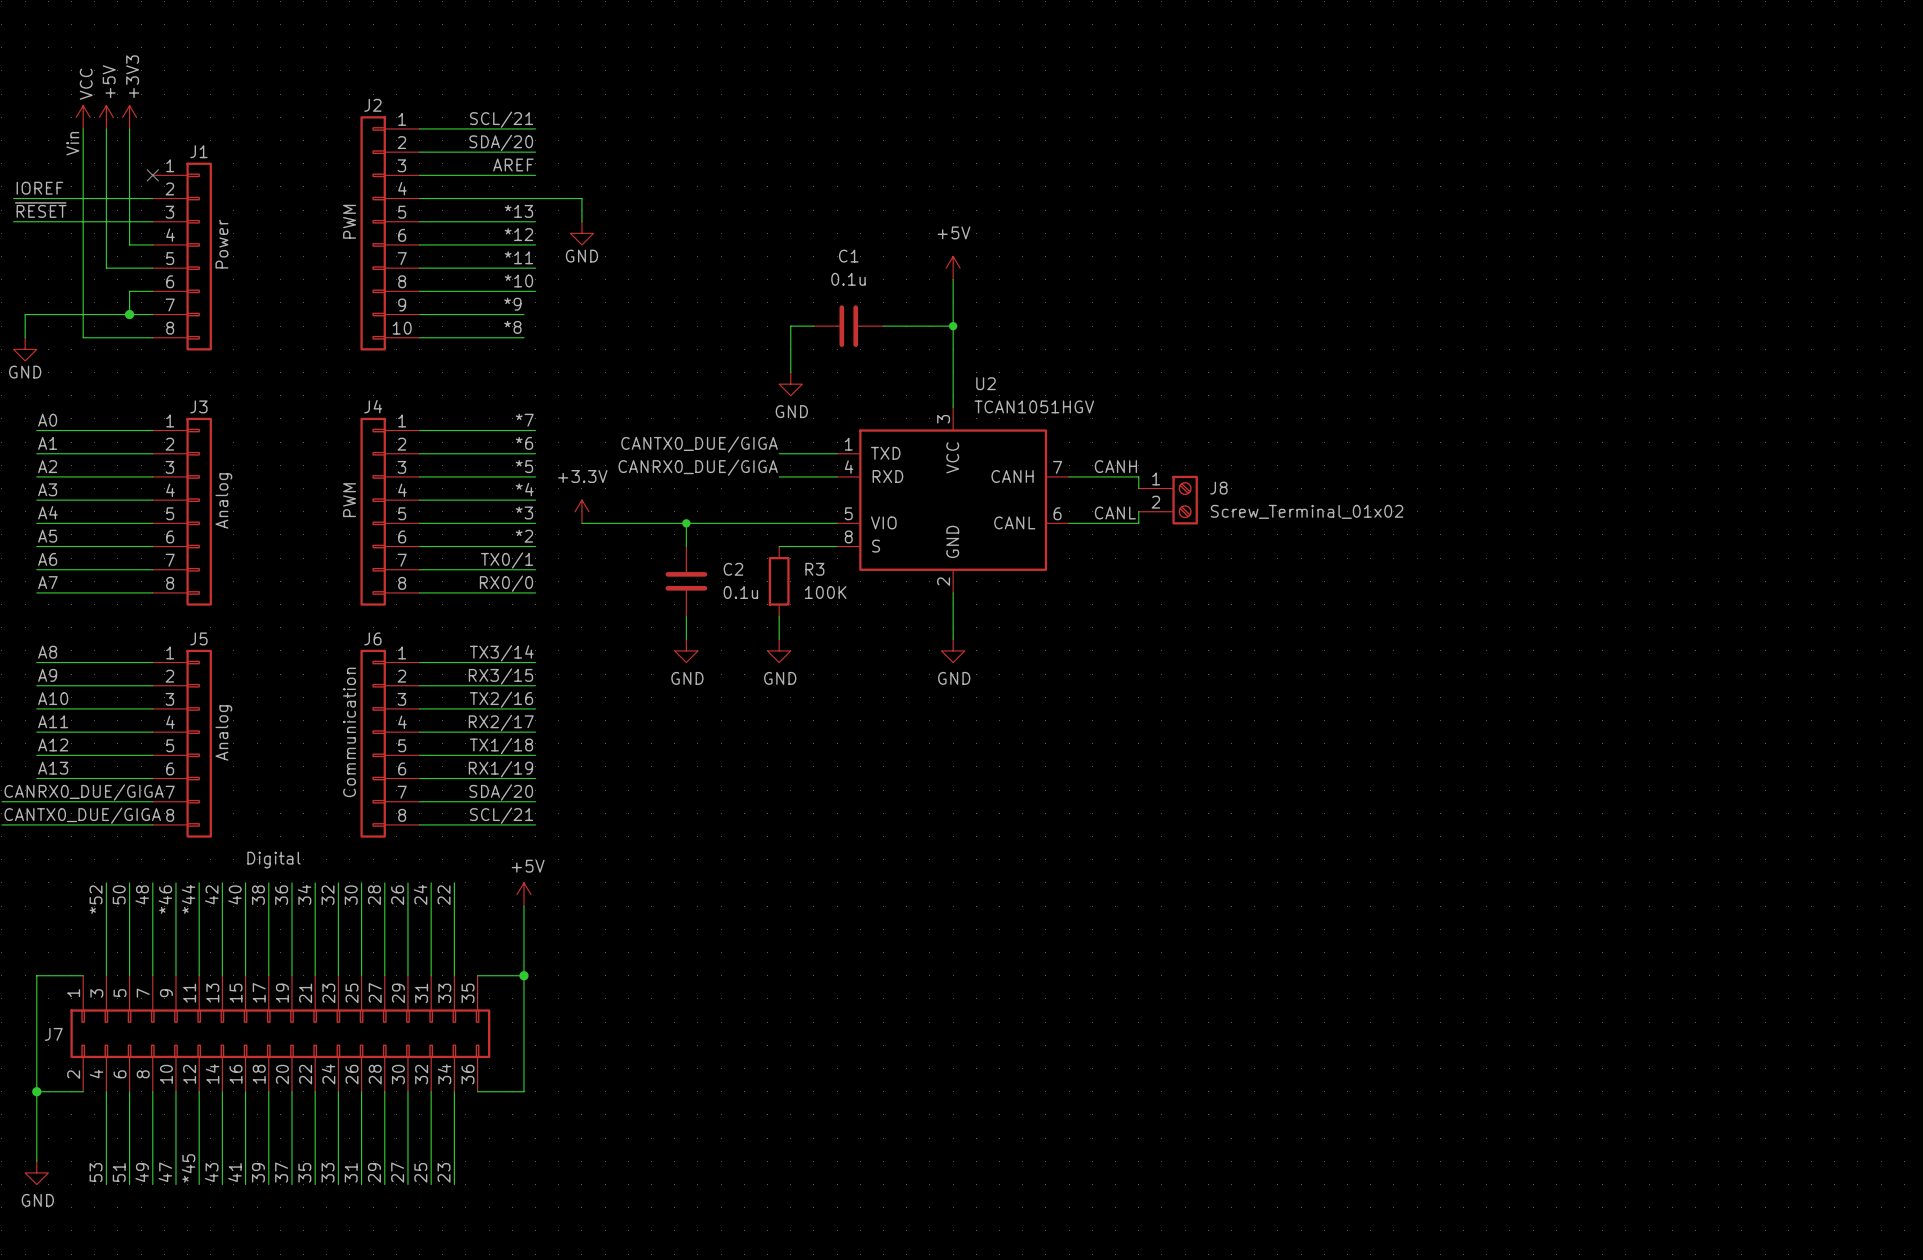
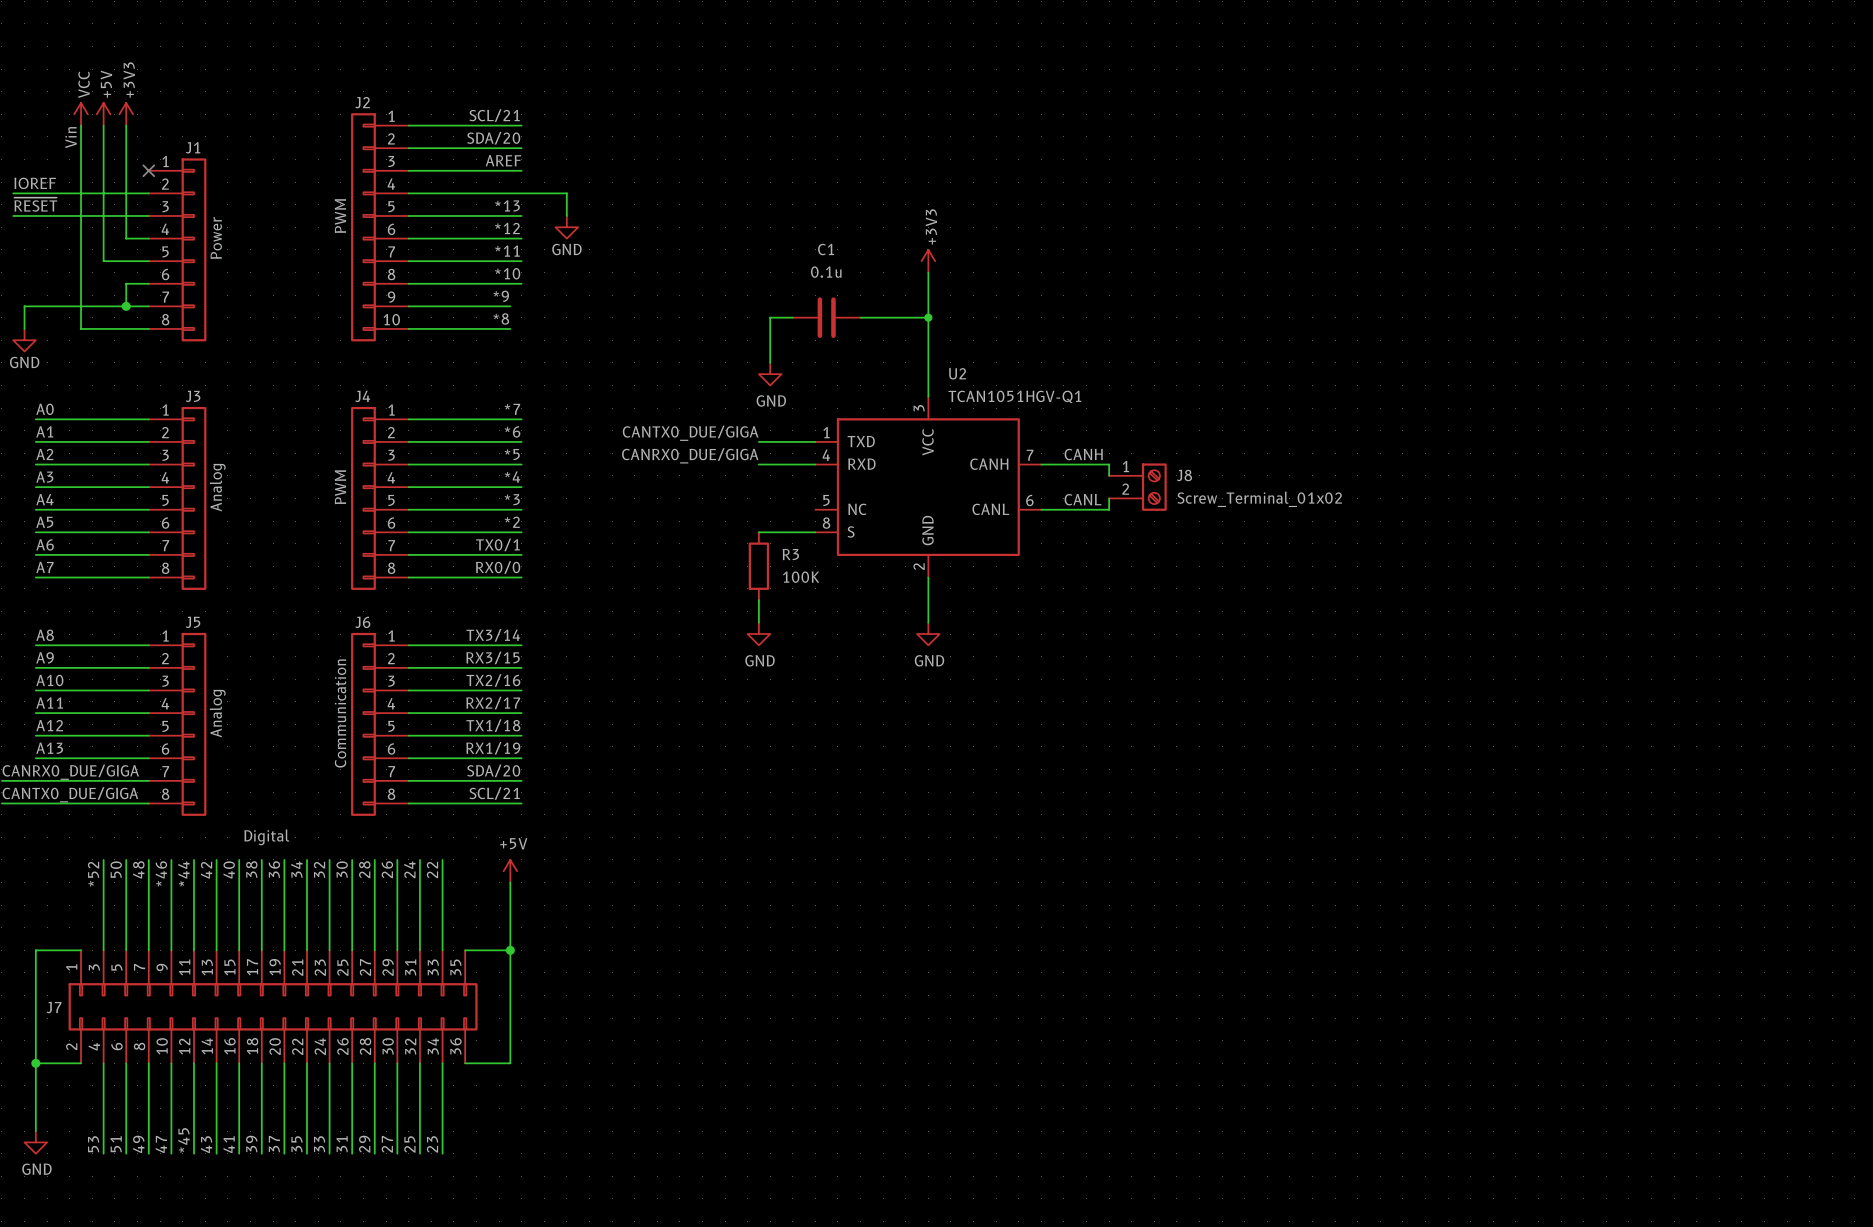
power symbol: +5V (953, 268) -> +3V3 (928, 261)
U2 value: TCAN1051HGV (1034, 406) -> TCAN1051HGV-Q1 (1014, 396)
power symbol: +3.3V (581, 511) -> none
U2 pin name: VIO (883, 522) -> NC (857, 509)
wire: (581, 523) (837, 523) -> none
wire: (686, 523) (686, 546) -> none
junction: (686, 523) -> none
C2: 0.1u (686, 581) -> none
wire: (686, 616) (686, 639) -> none
power symbol: GND (686, 650) -> none

